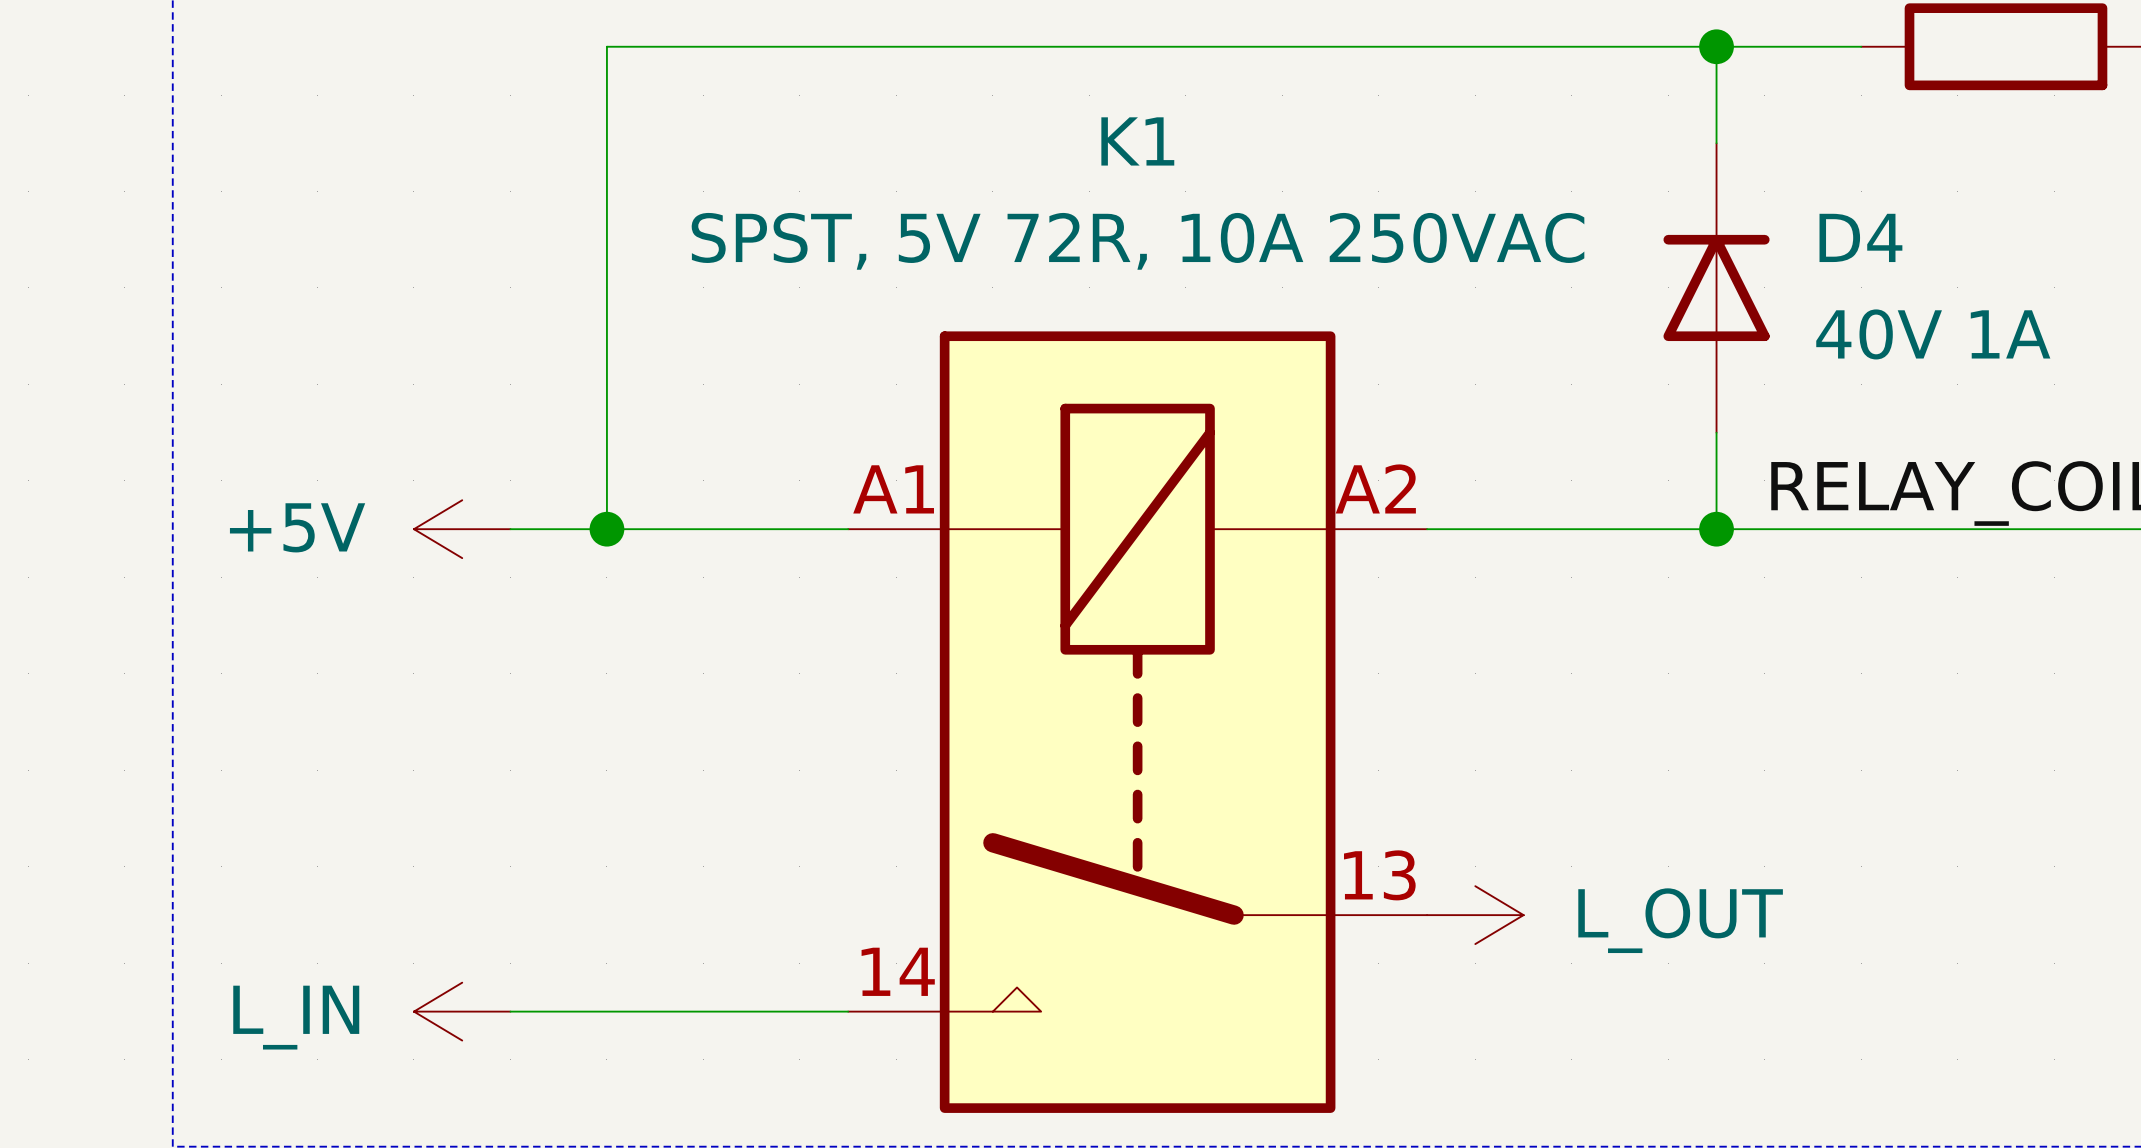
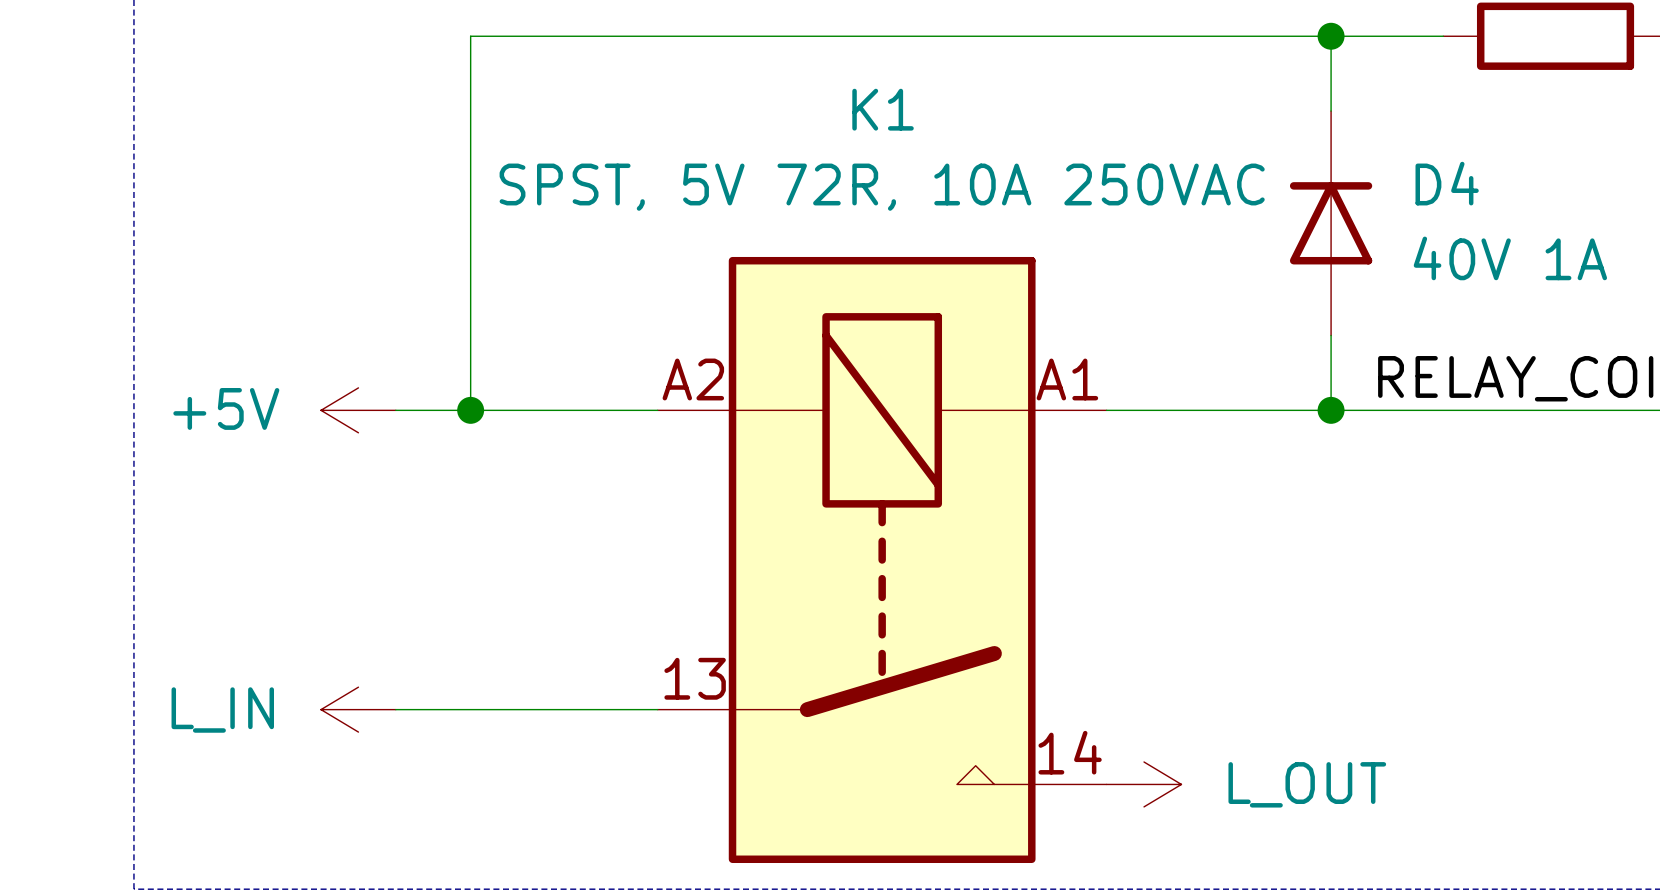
K1 flip: as is (1137, 722) -> left-right (882, 559)
power symbol position: L_OUT (1475, 915) -> L_OUT (1144, 784)
power symbol position: L_IN (462, 1011) -> L_IN (358, 709)
wire: (510, 1011) (848, 1011) -> (395, 709) (657, 709)

